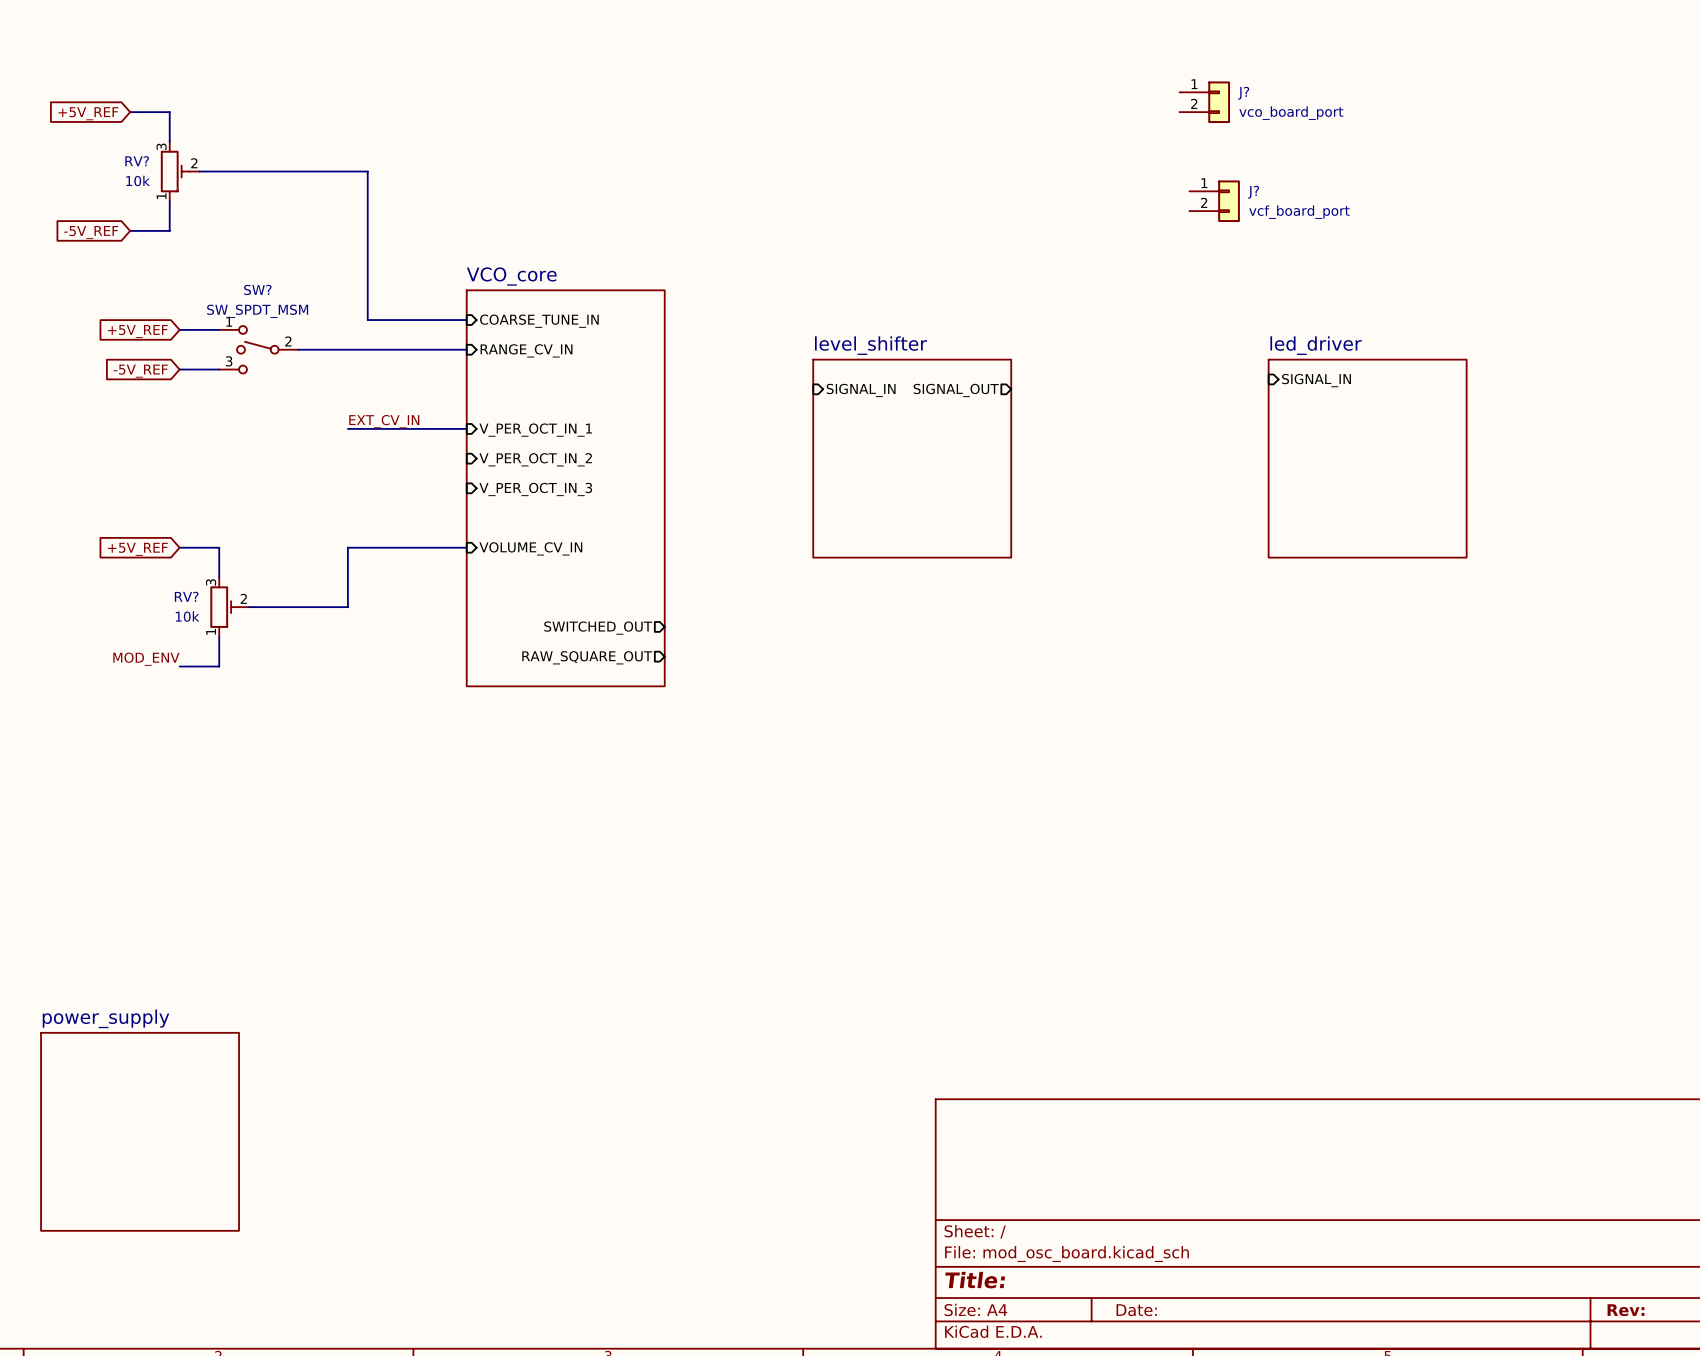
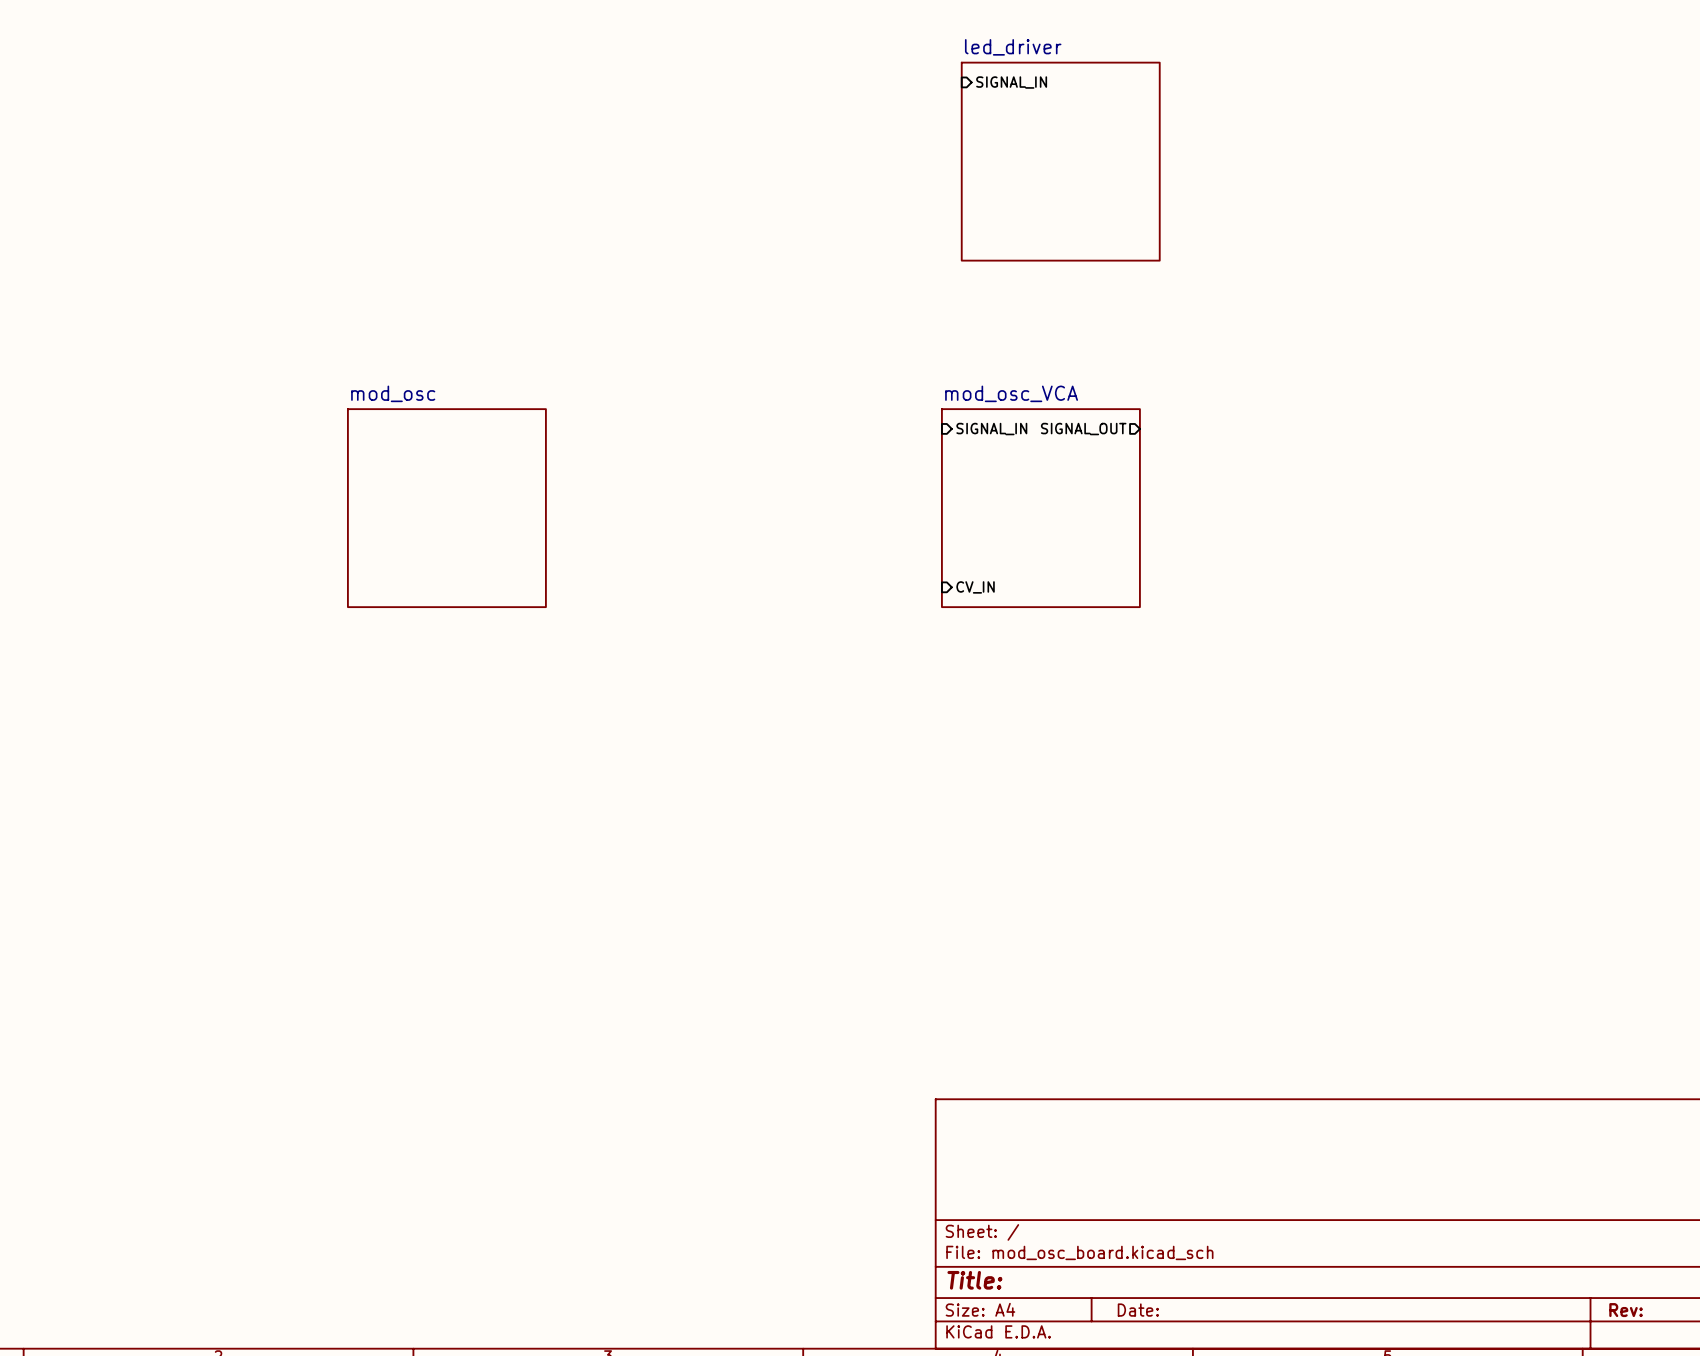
sheet pin: none -> SIGNAL_IN (1011, 82)
J?: vco_board_port (1204, 102) -> none
wire: (130, 112) (169, 112) (169, 141) -> none
global label: +5V_REF (88, 113) -> none
sheet led_driver: none -> (1060, 161)
RV?: 10k (180, 171) -> none
wire: (199, 171) (367, 171) (367, 320) (466, 320) -> none
wire: (169, 201) (169, 230) (130, 230) -> none
J?: vcf_board_port (1214, 201) -> none
global label: -5V_REF (91, 232) -> none
sheet pin: COARSE_TUNE_IN (539, 321) -> none
wire: (179, 329) (219, 329) -> none
global label: +5V_REF (137, 331) -> none
SW?: SW_SPDT_MSM (258, 349) -> none
wire: (298, 349) (466, 349) -> none
sheet pin: RANGE_CV_IN (526, 350) -> none
wire: (179, 369) (219, 369) -> none
global label: -5V_REF (140, 371) -> none
sheet pin: SIGNAL_IN (1316, 380) -> none
sheet pin position: SIGNAL_IN (861, 390) -> SIGNAL_IN (991, 429)
sheet pin position: SIGNAL_OUT (956, 390) -> SIGNAL_OUT (1083, 429)
label: EXT_CV_IN (384, 421) -> none
wire: (347, 428) (466, 428) -> none
sheet pin: V_PER_OCT_IN_1 (535, 430) -> none
sheet level_shifter: (912, 458) -> none
sheet led_driver: (1367, 458) -> none
sheet pin: V_PER_OCT_IN_2 (535, 459) -> none
sheet VCO_core: (565, 488) -> none
sheet pin: V_PER_OCT_IN_3 (535, 489) -> none
sheet mod_osc: none -> (446, 508)
sheet mod_osc_VCA: none -> (1040, 508)
wire: (179, 547) (219, 547) (219, 577) -> none
wire: (466, 547) (347, 547) (347, 607) (248, 607) -> none
sheet pin: VOLUME_CV_IN (530, 548) -> none
global label: +5V_REF (137, 549) -> none
sheet pin: none -> CV_IN (975, 587)
RV?: 10k (229, 607) -> none
sheet pin: SWITCHED_OUT (598, 628) -> none
wire: (219, 636) (219, 666) (179, 666) -> none
sheet pin: RAW_SQUARE_OUT (587, 657) -> none
label: MOD_ENV (146, 659) -> none
sheet power_supply: (140, 1131) -> none

